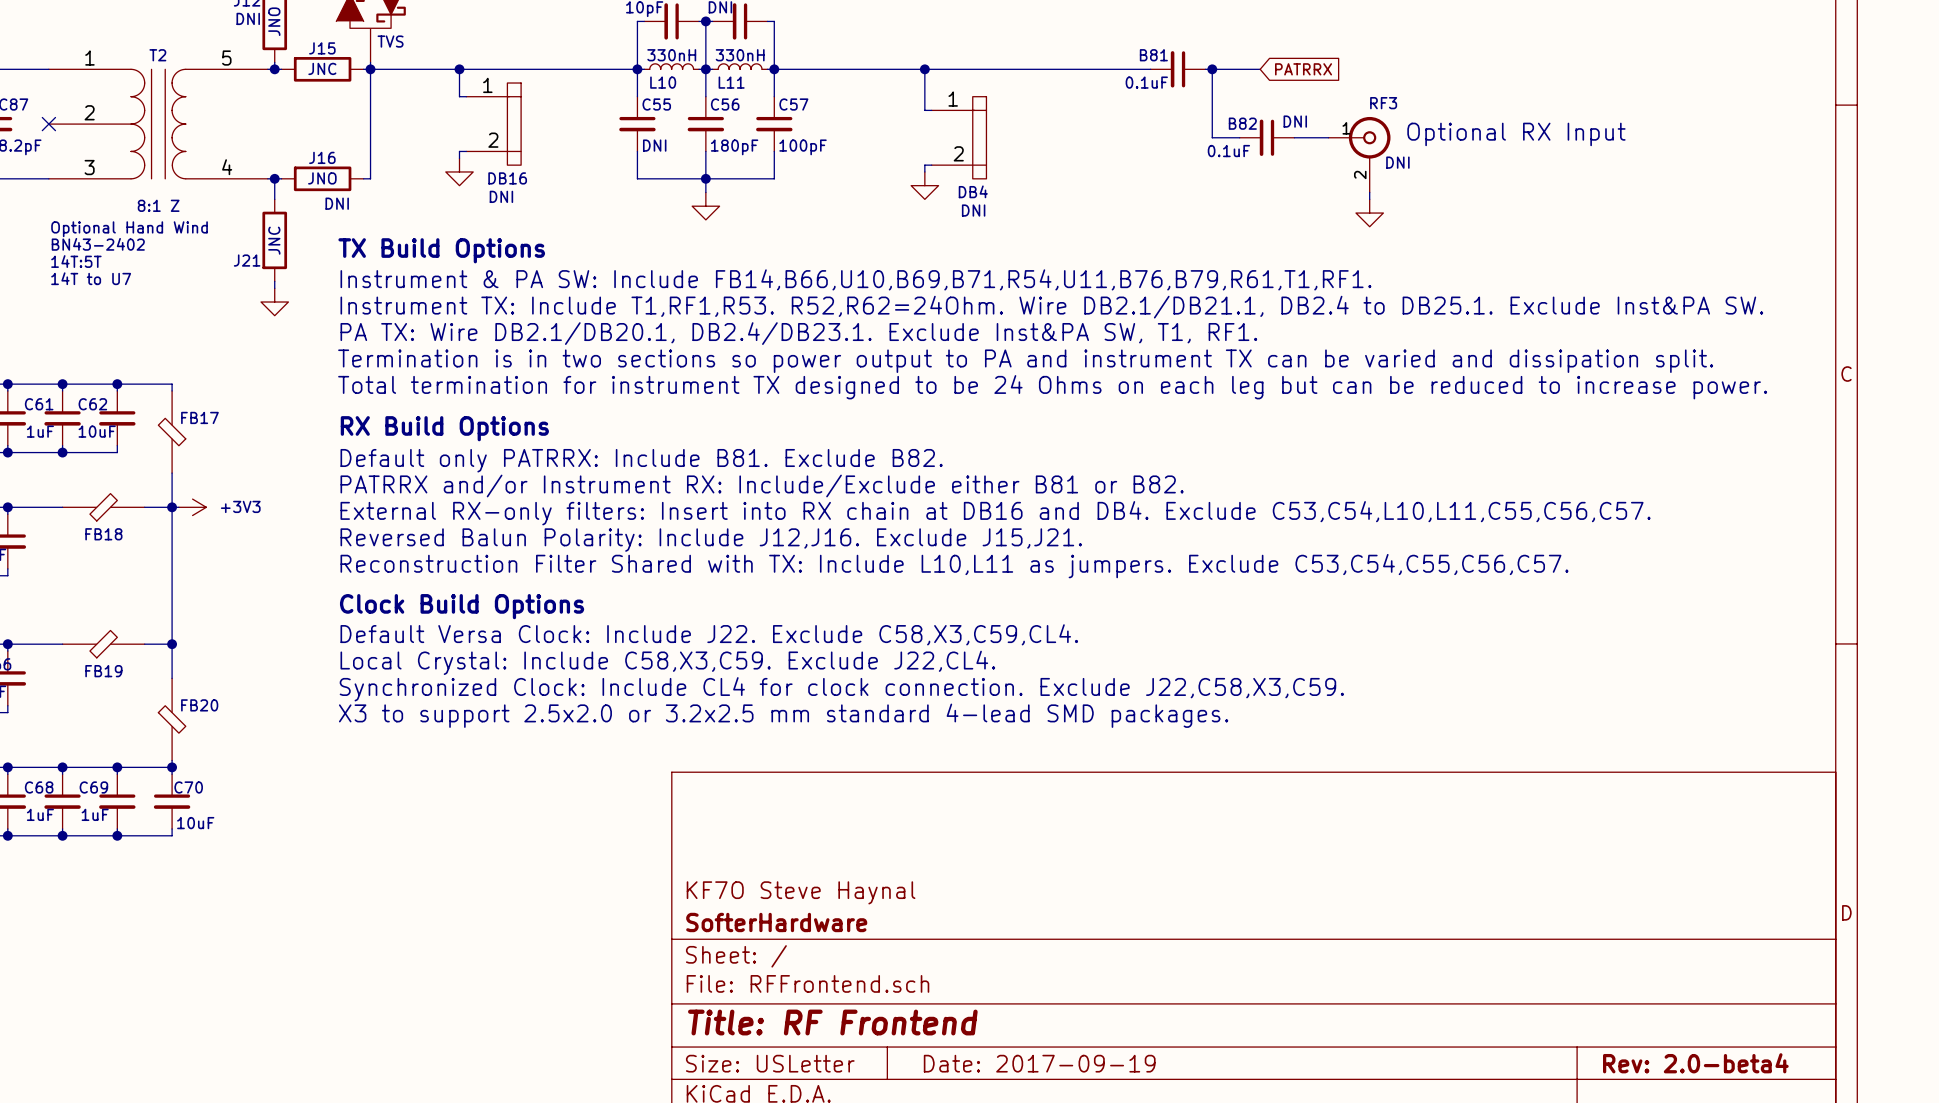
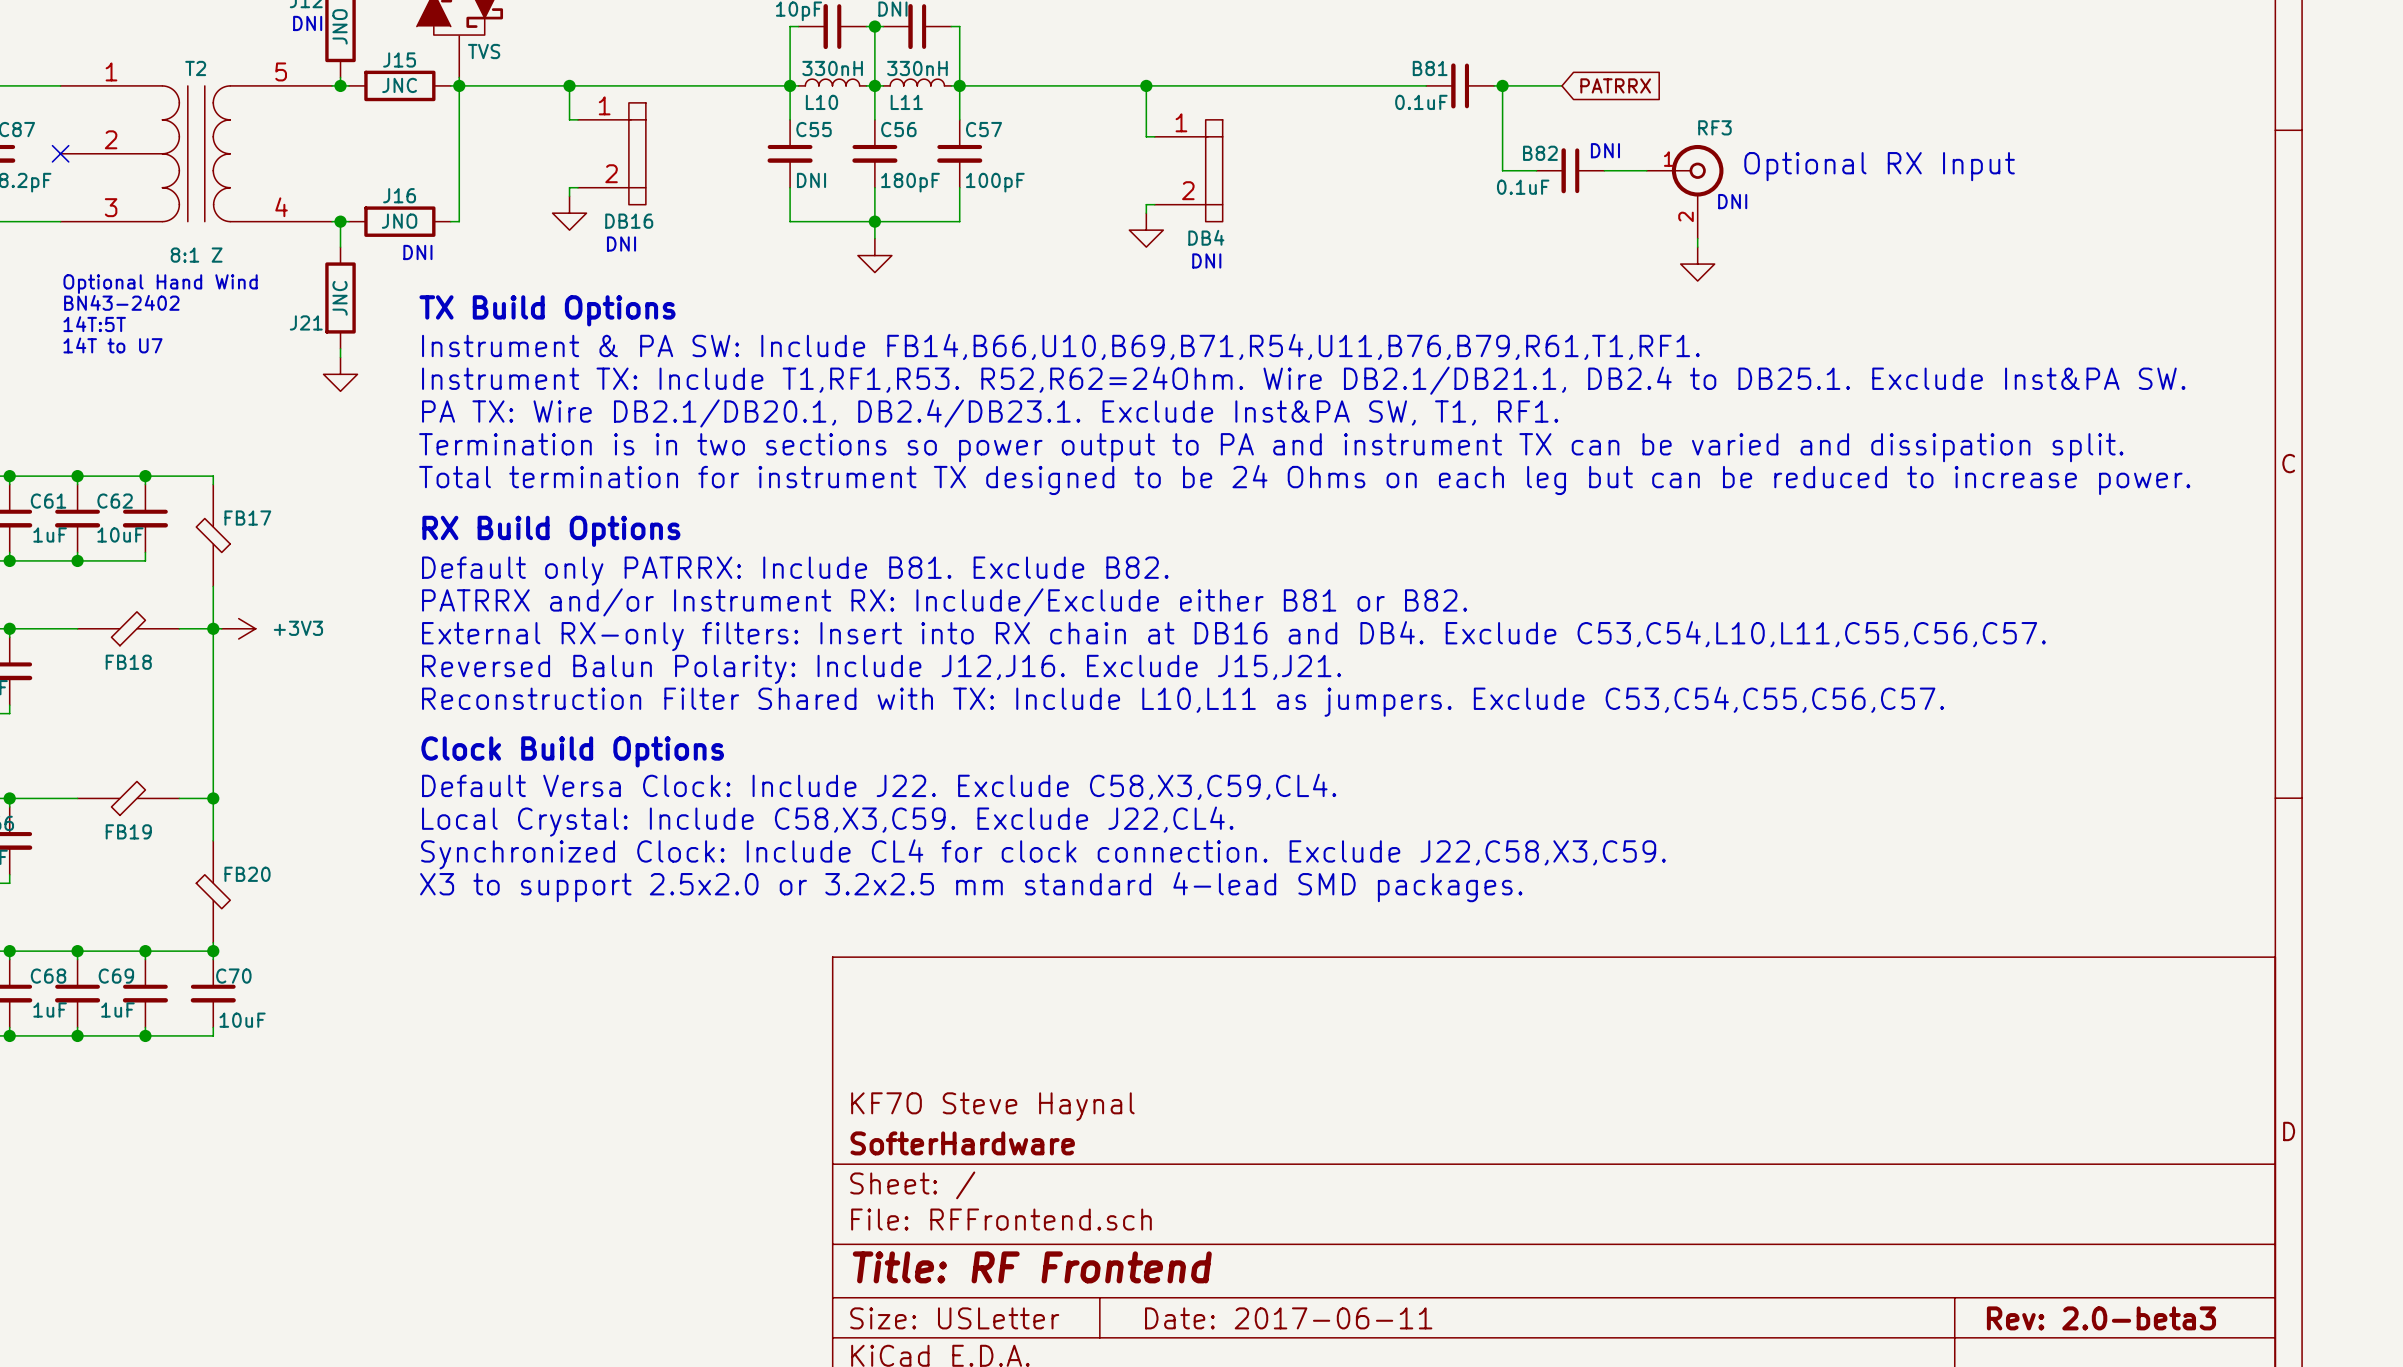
title block: Date: 2017-09-19 (1039, 1063) -> Date: 2017-06-11 (1288, 1318)
title block: Rev: 2.0-beta4 (1695, 1063) -> Rev: 2.0-beta3 (2101, 1318)

